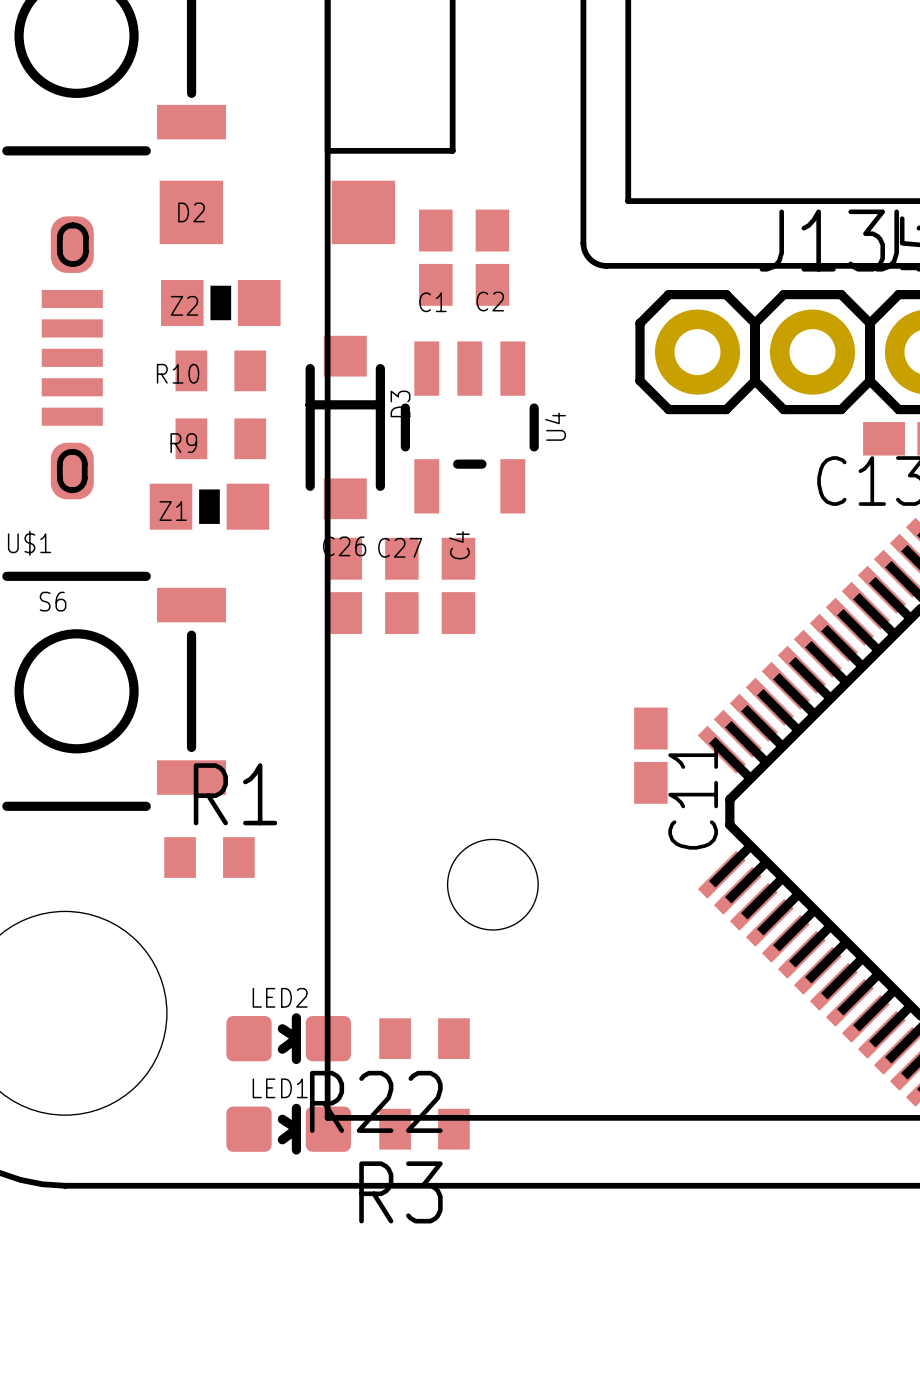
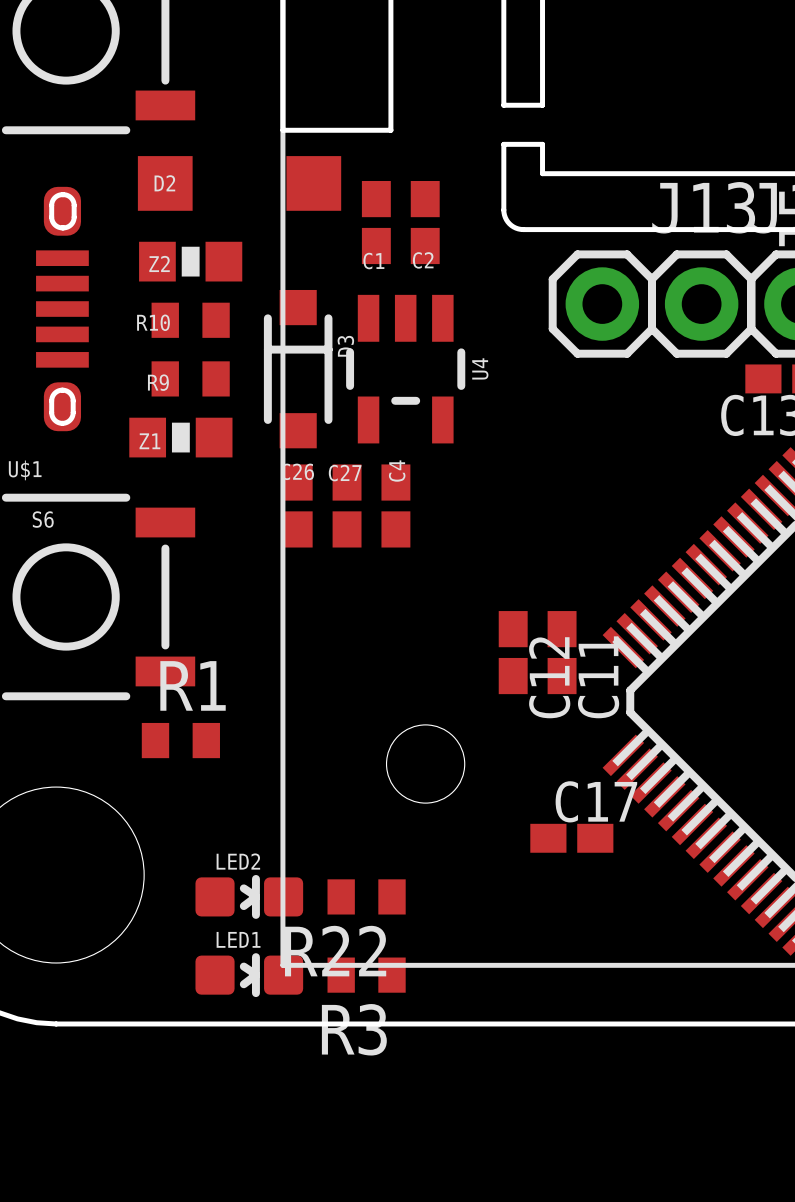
board edge: (583, 121) (583, 167) -> (503, 105) (542, 105)
board edge: (628, 121) (628, 167) -> (503, 144) (542, 144)
C12: none -> (513, 652)
C17: none -> (571, 838)

